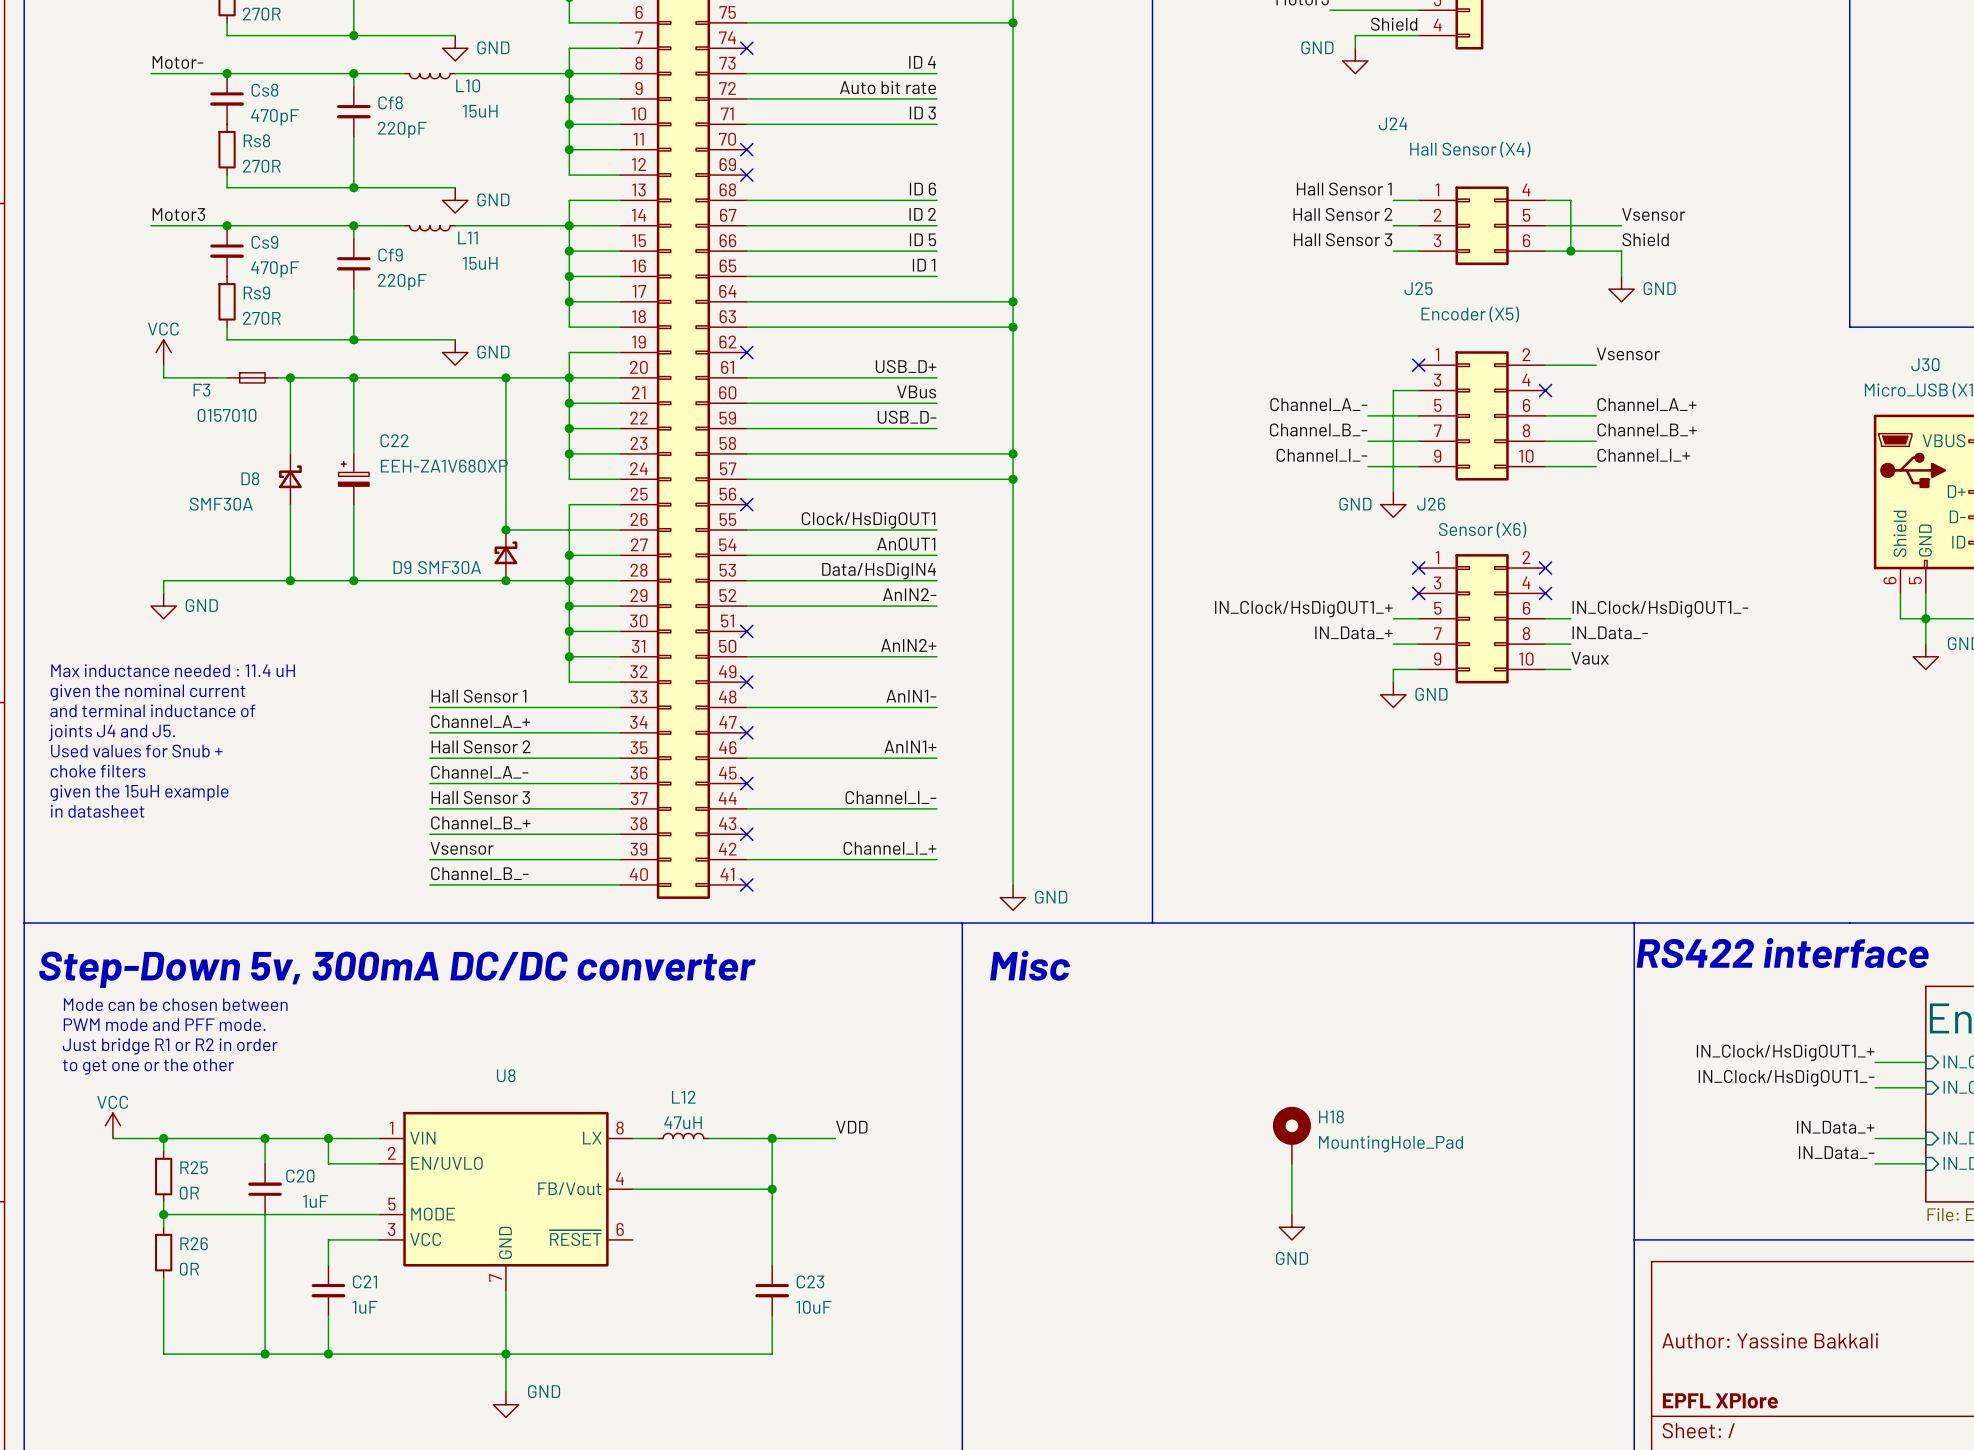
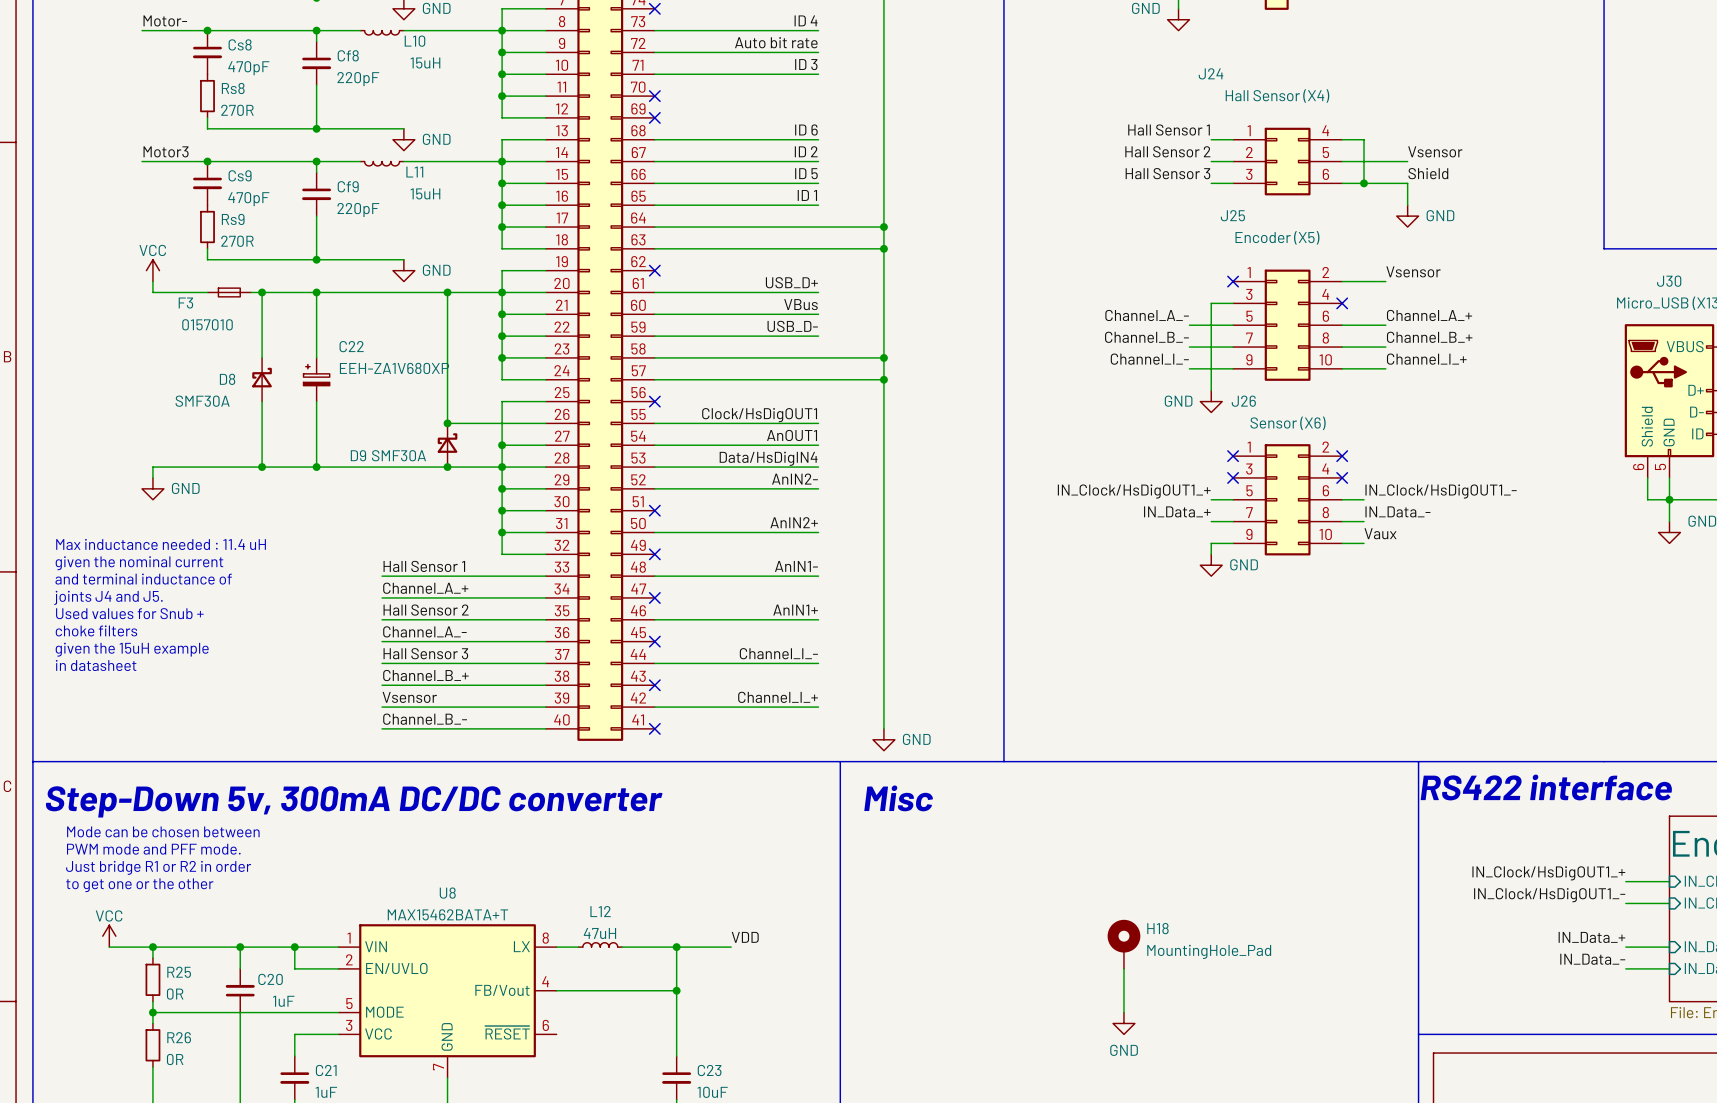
U8 value: none -> MAX15462BATA+T (447, 914)

